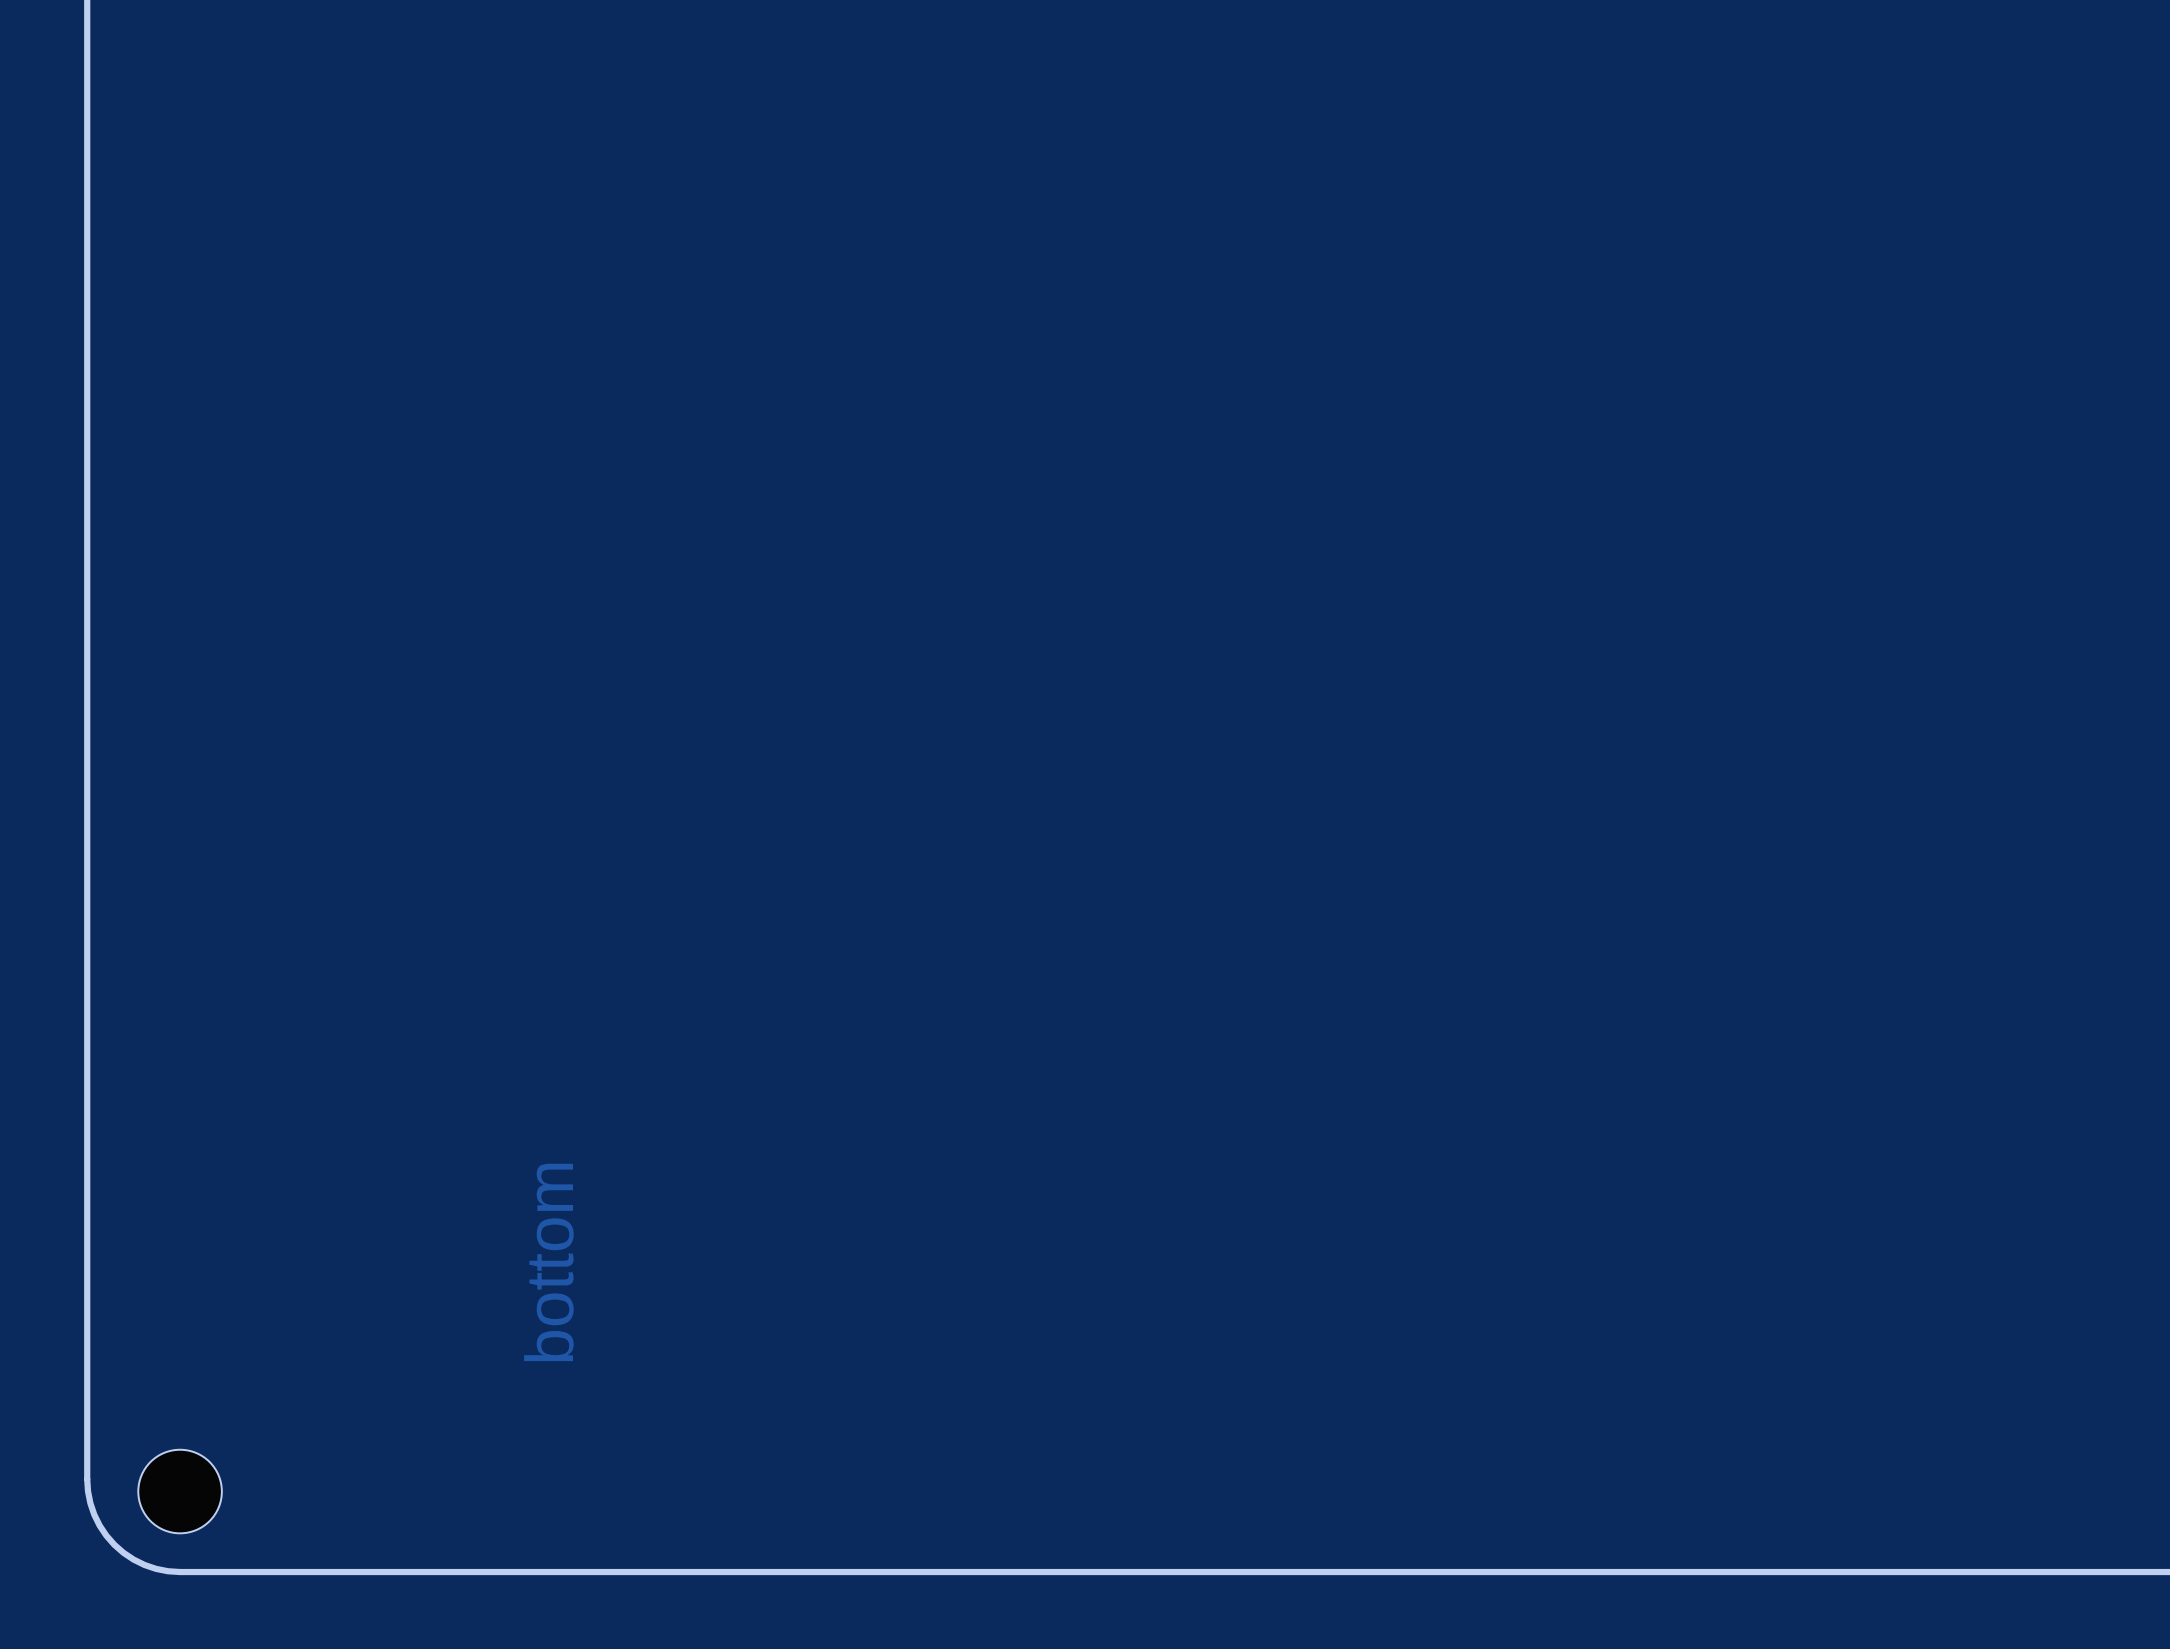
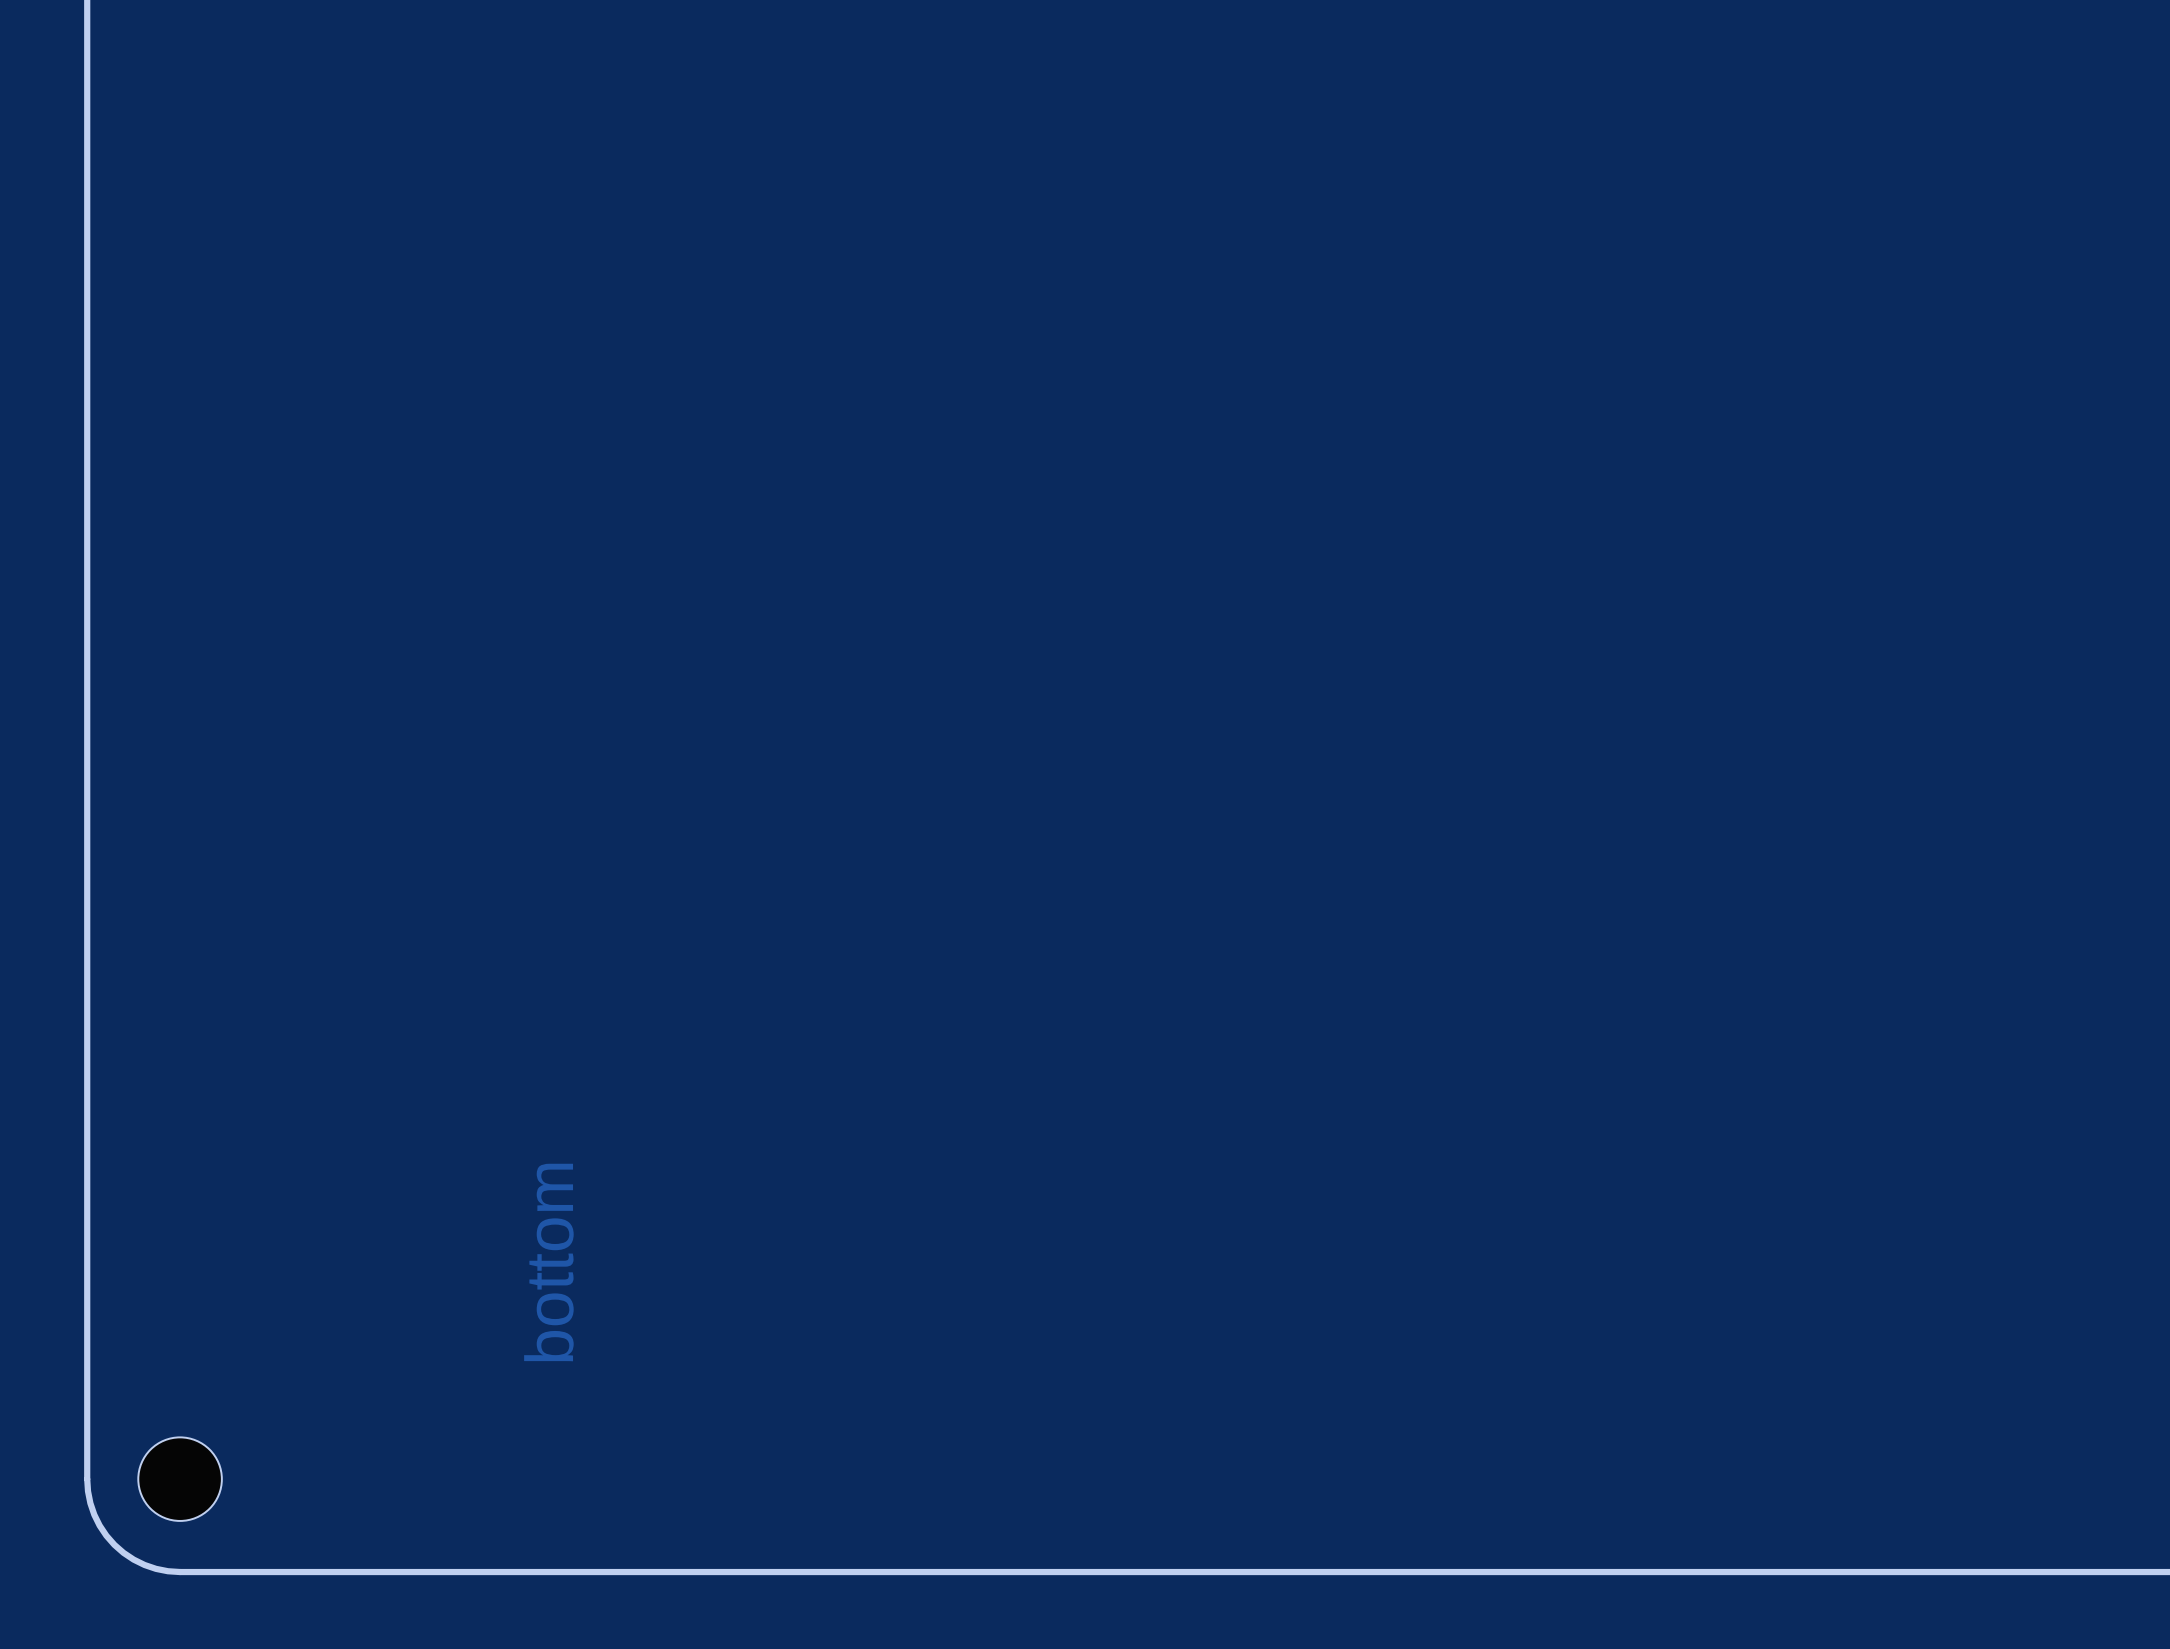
part position: (180, 1491) -> (180, 1479)

